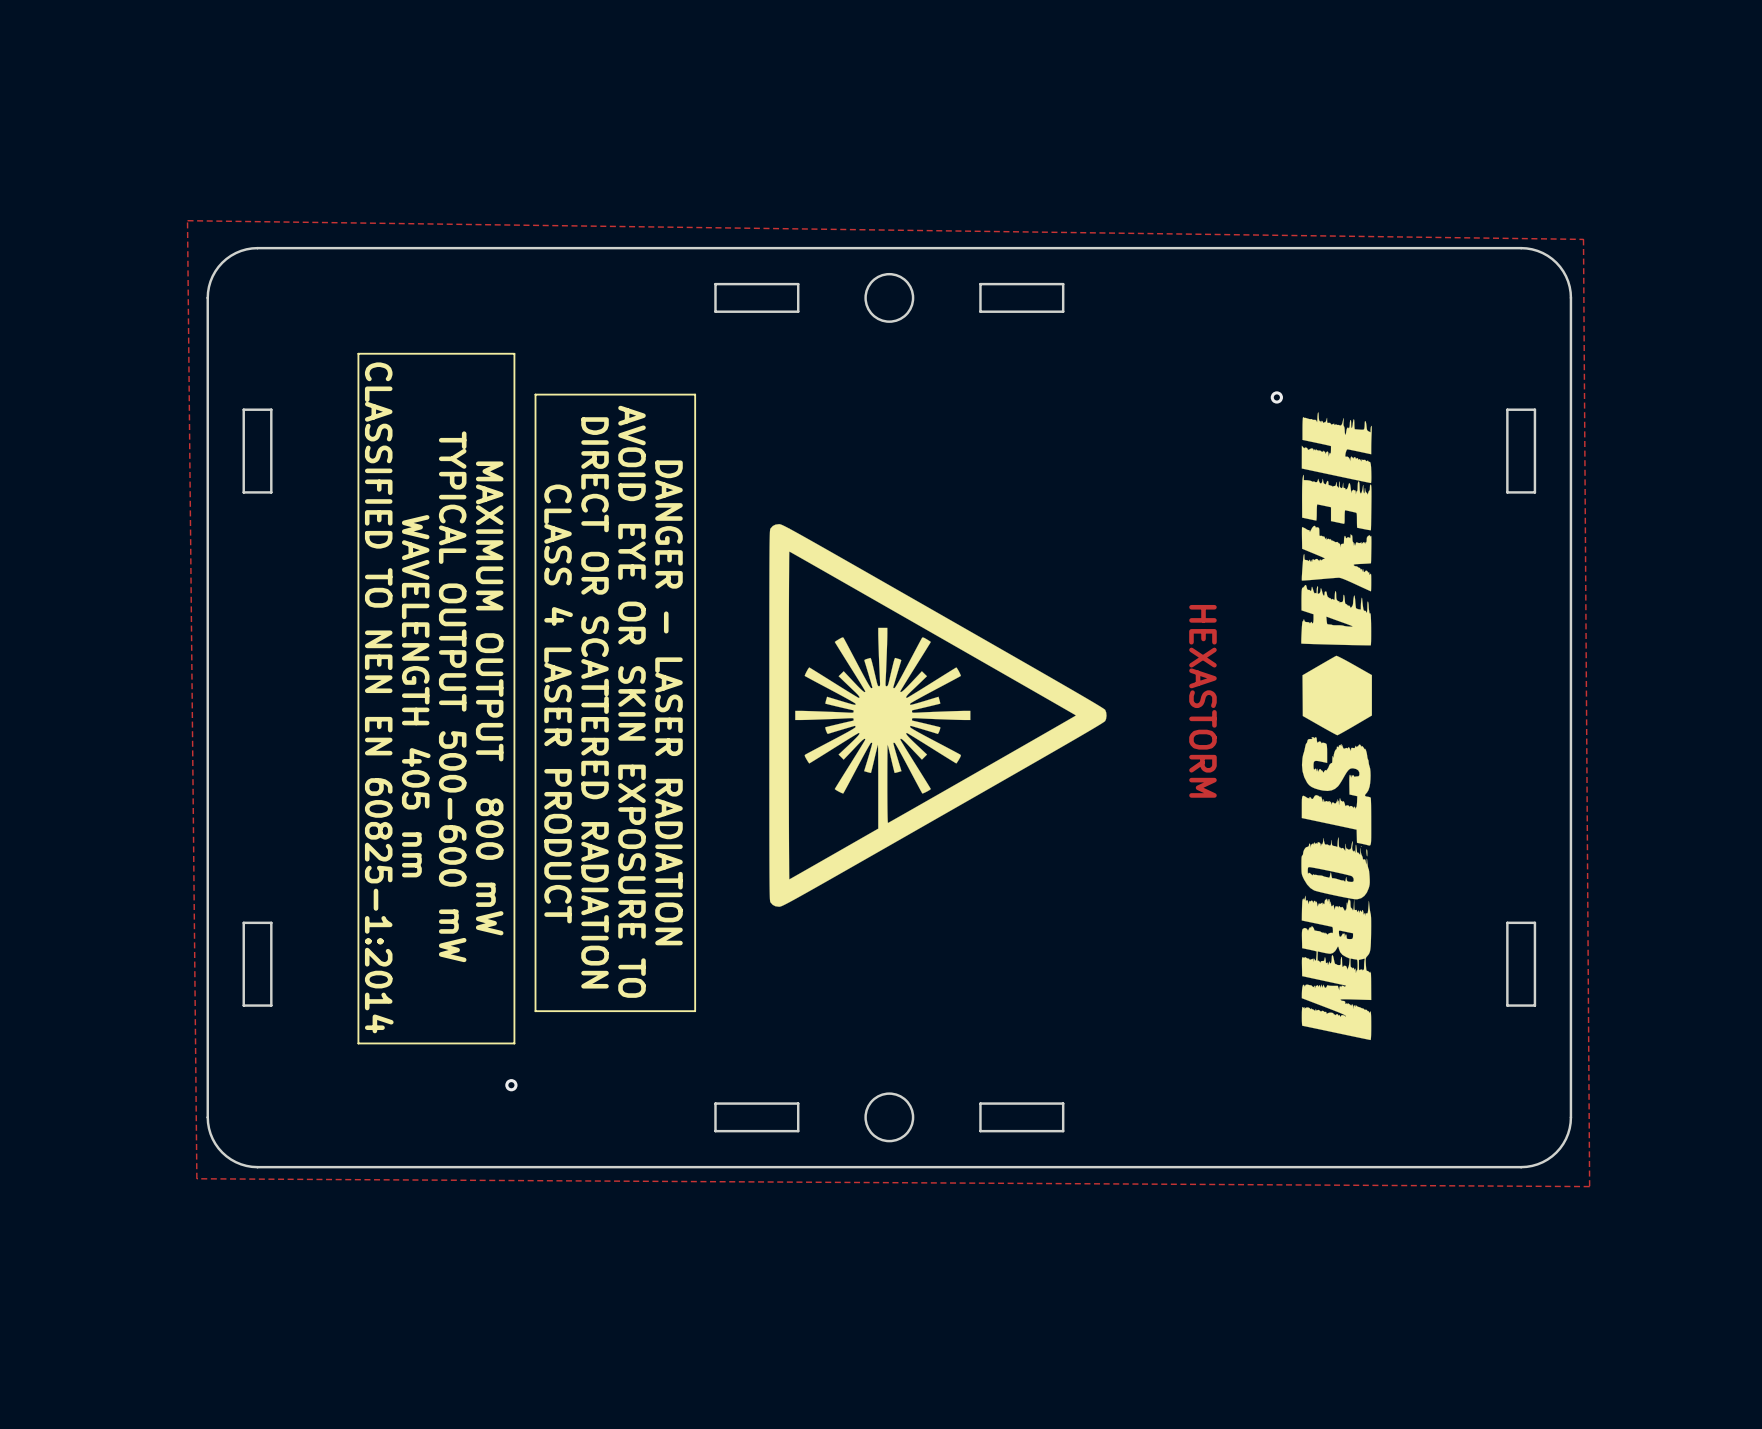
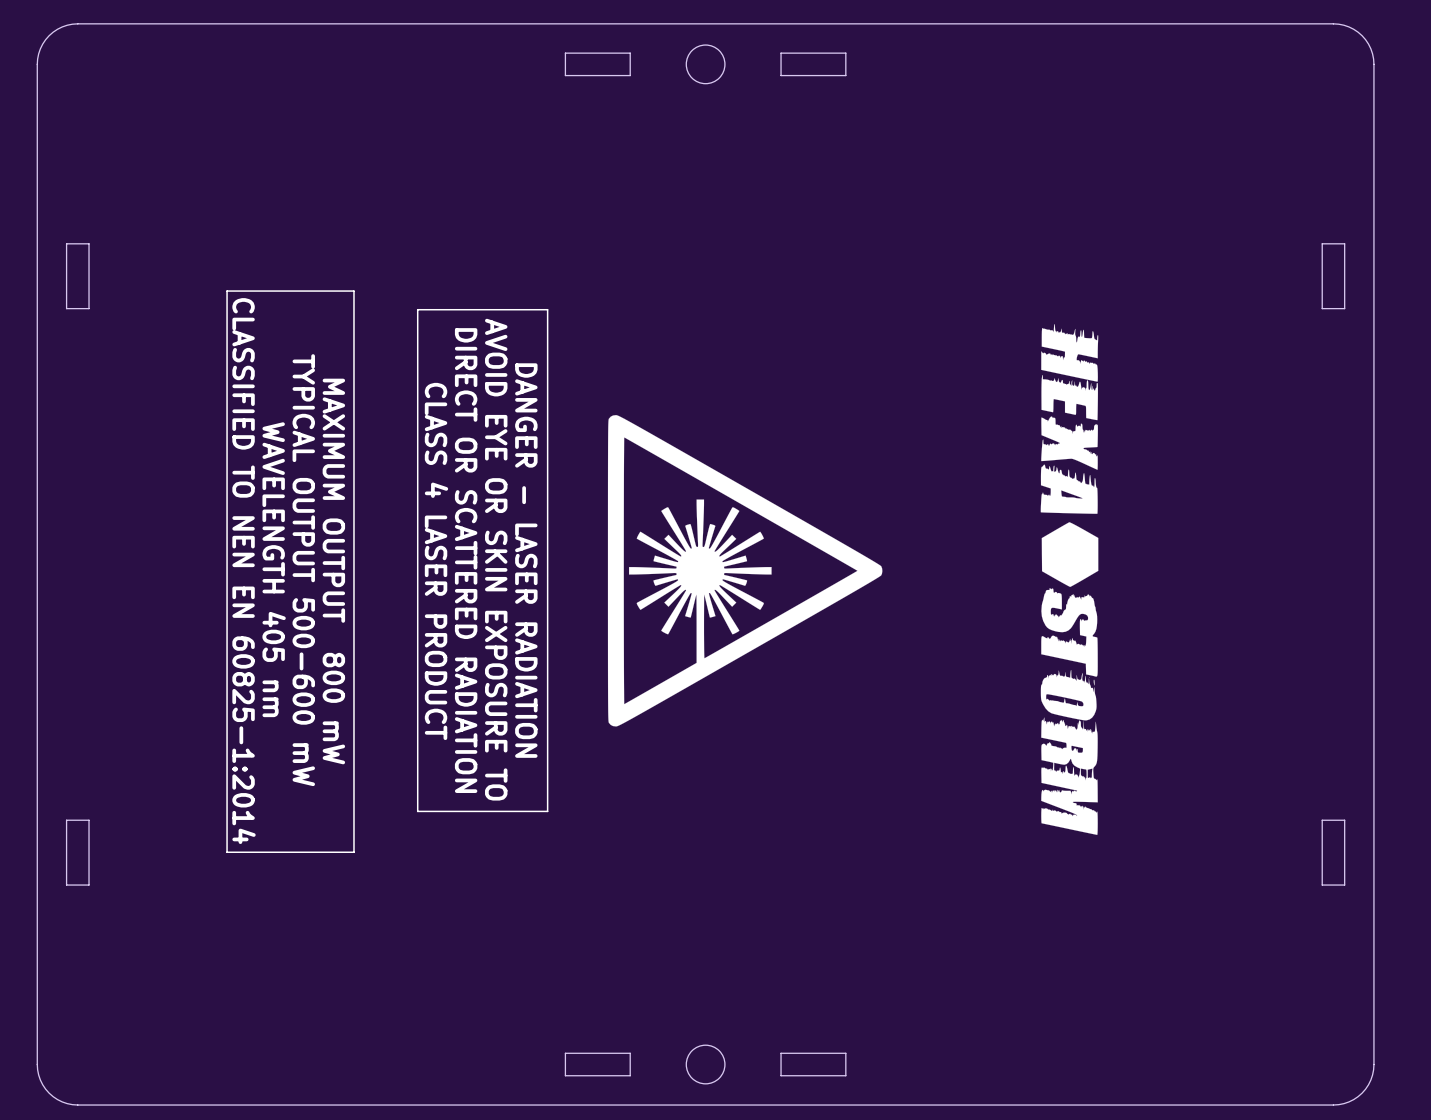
round board edge: none -> [685, 44, 726, 84]
board edge: none -> (565, 53) (630, 53) (630, 75) (565, 75) (565, 53)
board edge: none -> (781, 53) (845, 53) (845, 75) (781, 75) (781, 53)
zone outline: (187, 220) (196, 1178) (1589, 1186) (1583, 239) (187, 220) -> none
board edge: (257, 248) (1521, 248) (1532, 249) (1547, 255) (1556, 262) (1566, 276) (1570, 297) (1570, 1117) (1569, 1128) (1563, 1143) (1556, 1152) (1542, 1162) (1521, 1167) (257, 1167) (241, 1164) (231, 1159) (215, 1143) (210, 1133) (207, 1117) (207, 297) (210, 281) (222, 262) (235, 253) (257, 248) -> (77, 23) (62, 26) (49, 35) (40, 48) (37, 64) (37, 1064) (42, 1084) (53, 1096) (67, 1103) (77, 1105) (1333, 1105) (1353, 1099) (1365, 1089) (1372, 1075) (1373, 1064) (1373, 64) (1370, 48) (1358, 32) (1343, 25) (1333, 23) (77, 23)
round board edge: [864, 272, 915, 323] -> none
board edge: (715, 284) (798, 284) (798, 311) (715, 311) (715, 284) -> none
board edge: (980, 284) (980, 311) (1063, 311) (1063, 284) (980, 284) -> none
board edge: none -> (66, 243) (89, 243) (89, 308) (66, 308) (66, 243)
board edge: none -> (1322, 243) (1322, 308) (1344, 308) (1344, 243) (1322, 243)
line: (514, 353) (514, 1043) -> (353, 291) (353, 852)
line: (514, 353) (358, 353) (358, 1043) -> (353, 291) (227, 291) (227, 852)
via: (1276, 397) -> none
board edge: (243, 409) (271, 409) (271, 492) (243, 492) (243, 409) -> none
board edge: (1507, 409) (1507, 492) (1534, 492) (1534, 409) (1507, 409) -> none
text position: WAVELENGTH 405 nm (416, 696) -> WAVELENGTH 405 nm (274, 569)
text position: TYPICAL OUTPUT 500-600 mW (452, 696) -> TYPICAL OUTPUT 500-600 mW (303, 570)
text position: CLASSIFIED TO NEN EN 60825-1:2014 (379, 697) -> CLASSIFIED TO NEN EN 60825-1:2014 (244, 571)
text position: MAXIMUM OUTPUT 800 mW (489, 698) -> MAXIMUM OUTPUT 800 mW (333, 571)
text: HEXASTORM (1202, 701) -> none
board edge: (243, 922) (271, 922) (271, 1005) (243, 1005) (243, 922) -> none
board edge: (1507, 922) (1507, 1005) (1534, 1005) (1534, 922) (1507, 922) -> none
board edge: none -> (66, 820) (89, 820) (89, 885) (66, 885) (66, 820)
board edge: none -> (1322, 820) (1344, 820) (1344, 885) (1322, 885) (1322, 820)
line: (358, 1043) (514, 1043) -> (227, 852) (354, 852)
via: (511, 1085) -> none
round board edge: [864, 1092, 915, 1143] -> none
board edge: (715, 1103) (798, 1103) (798, 1131) (715, 1131) (715, 1103) -> none
board edge: (980, 1103) (980, 1131) (1063, 1131) (1063, 1103) (980, 1103) -> none
round board edge: none -> [685, 1044, 726, 1085]
board edge: none -> (565, 1053) (565, 1075) (630, 1075) (630, 1053) (565, 1053)
board edge: none -> (781, 1053) (781, 1075) (845, 1075) (845, 1053) (781, 1053)

